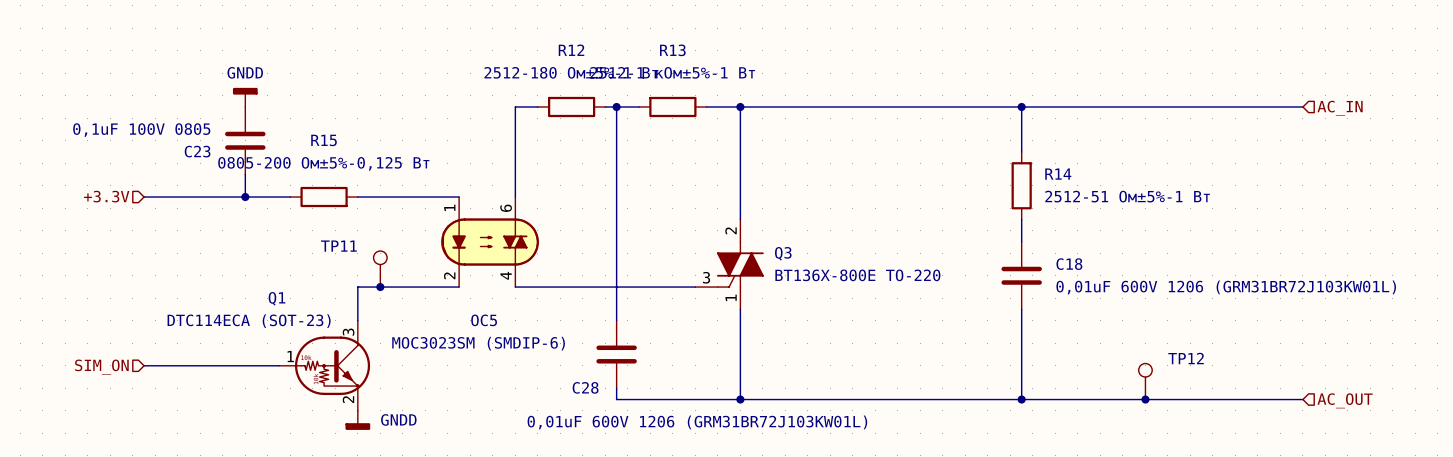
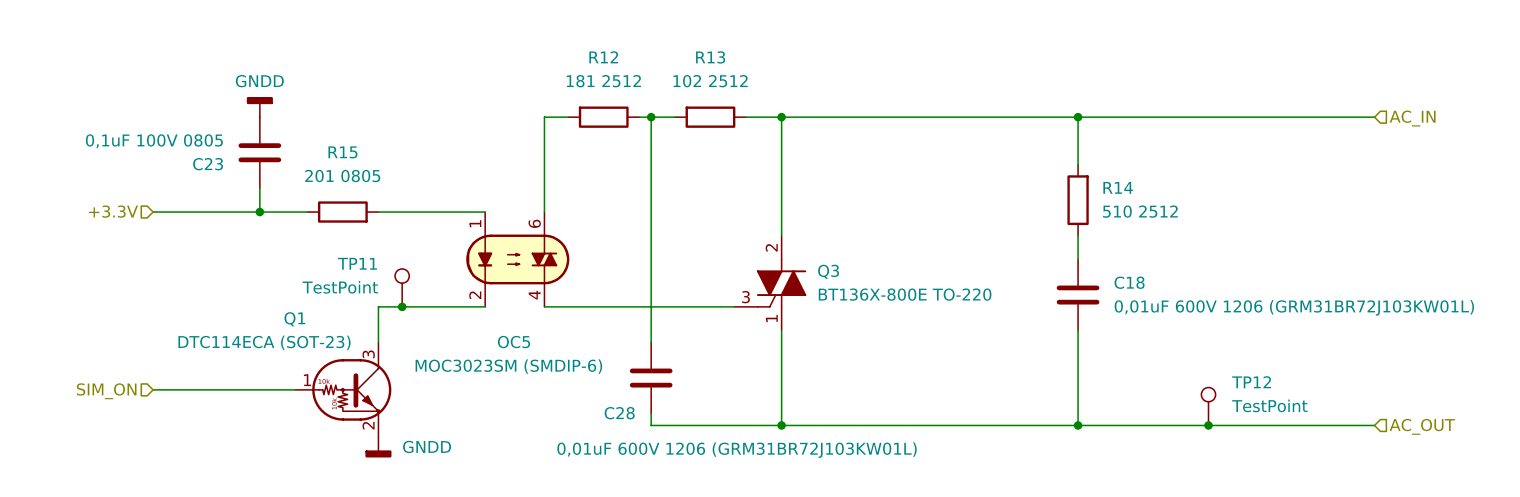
R12 value: 2512-180 Ом±5%-1 Вт (571, 72) -> 181 2512 (603, 81)
R13 value: 2512-1 кОм±5%-1 Вт (672, 72) -> 102 2512 (710, 81)
R15 value: 0805-200 Ом±5%-0,125 Вт (323, 163) -> 201 0805 (342, 176)
R14 value: 2512-51 Ом±5%-1 Вт (1127, 196) -> 510 2512 (1140, 211)
TP11 value: none -> TestPoint (340, 287)
TP12 value: none -> TestPoint (1269, 405)

